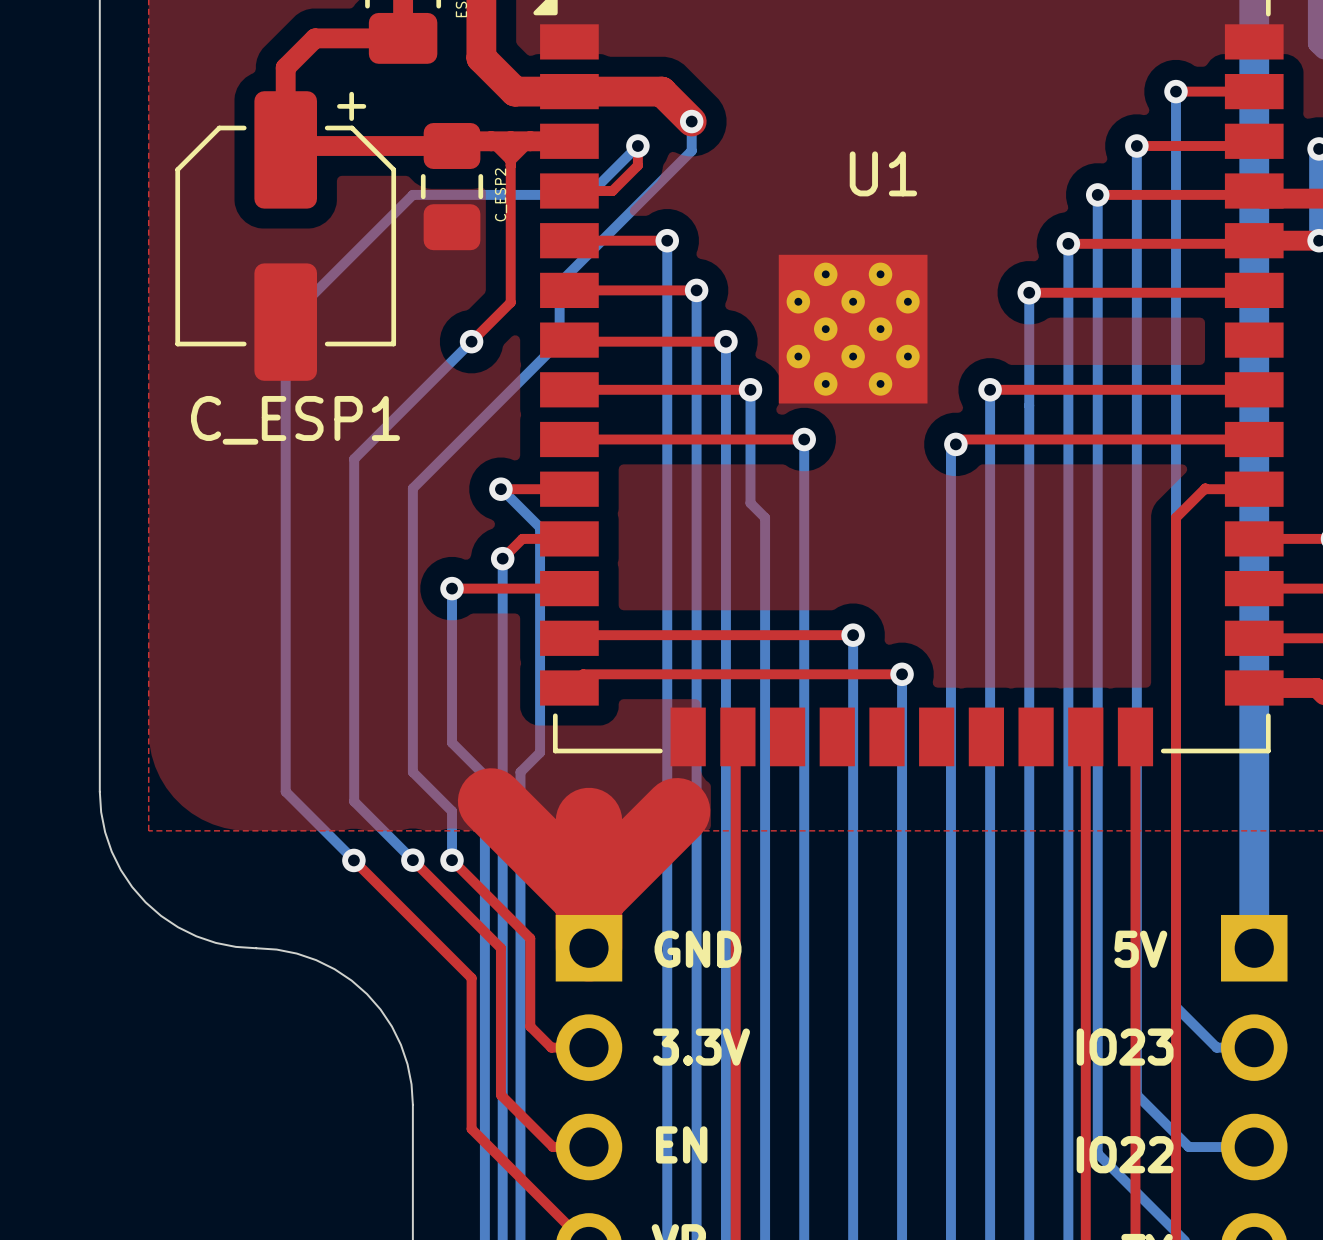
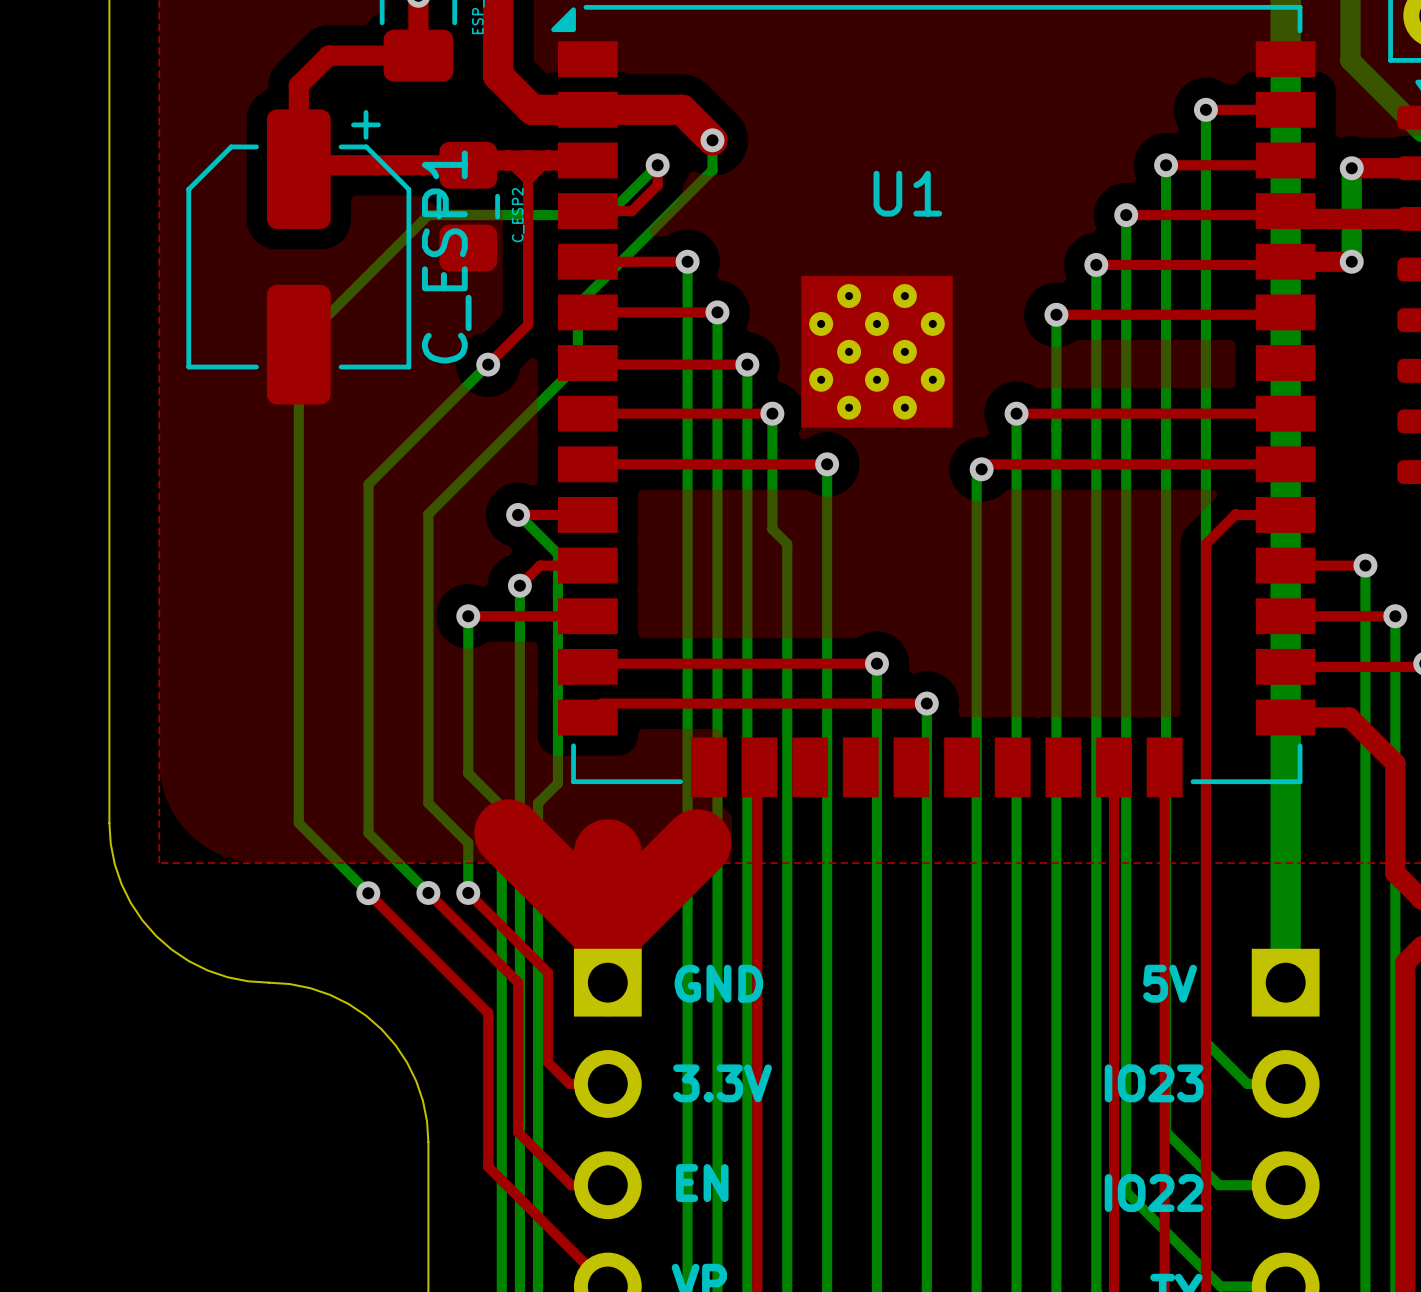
C_ESP1 name rotation: 0° (295, 420) -> 90° counterclockwise (446, 256)

